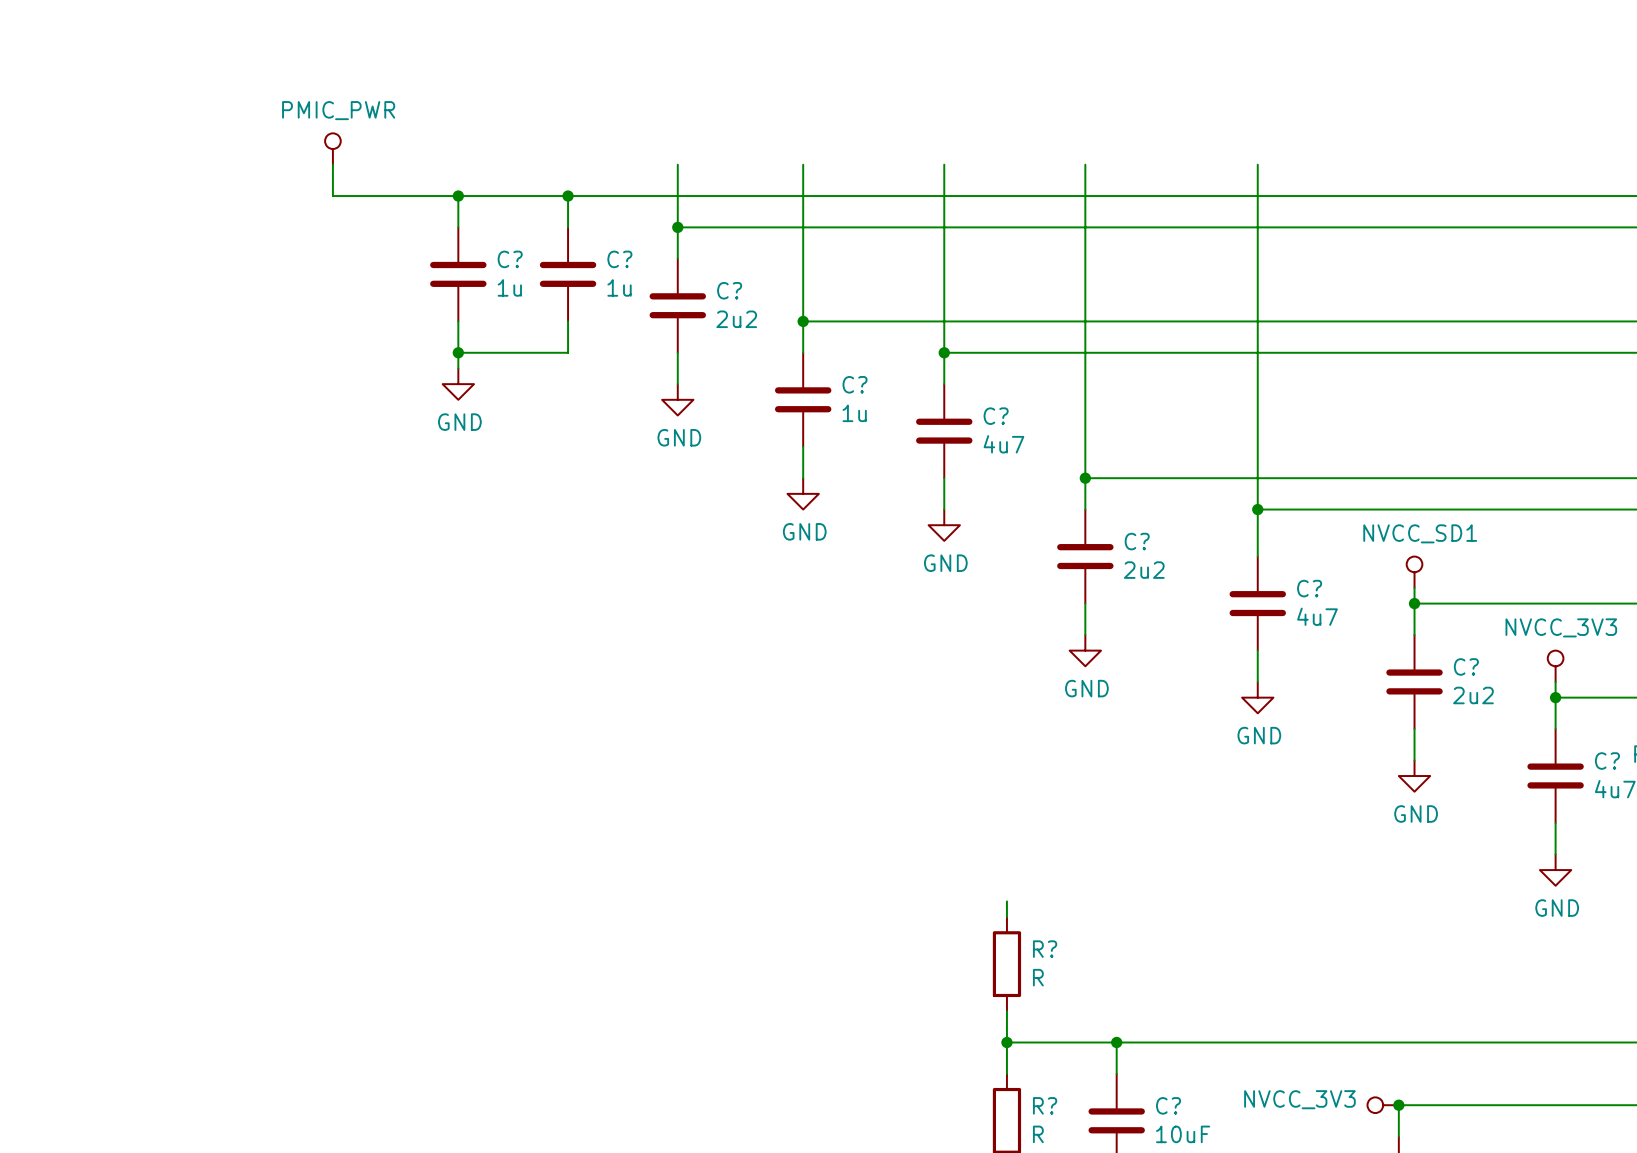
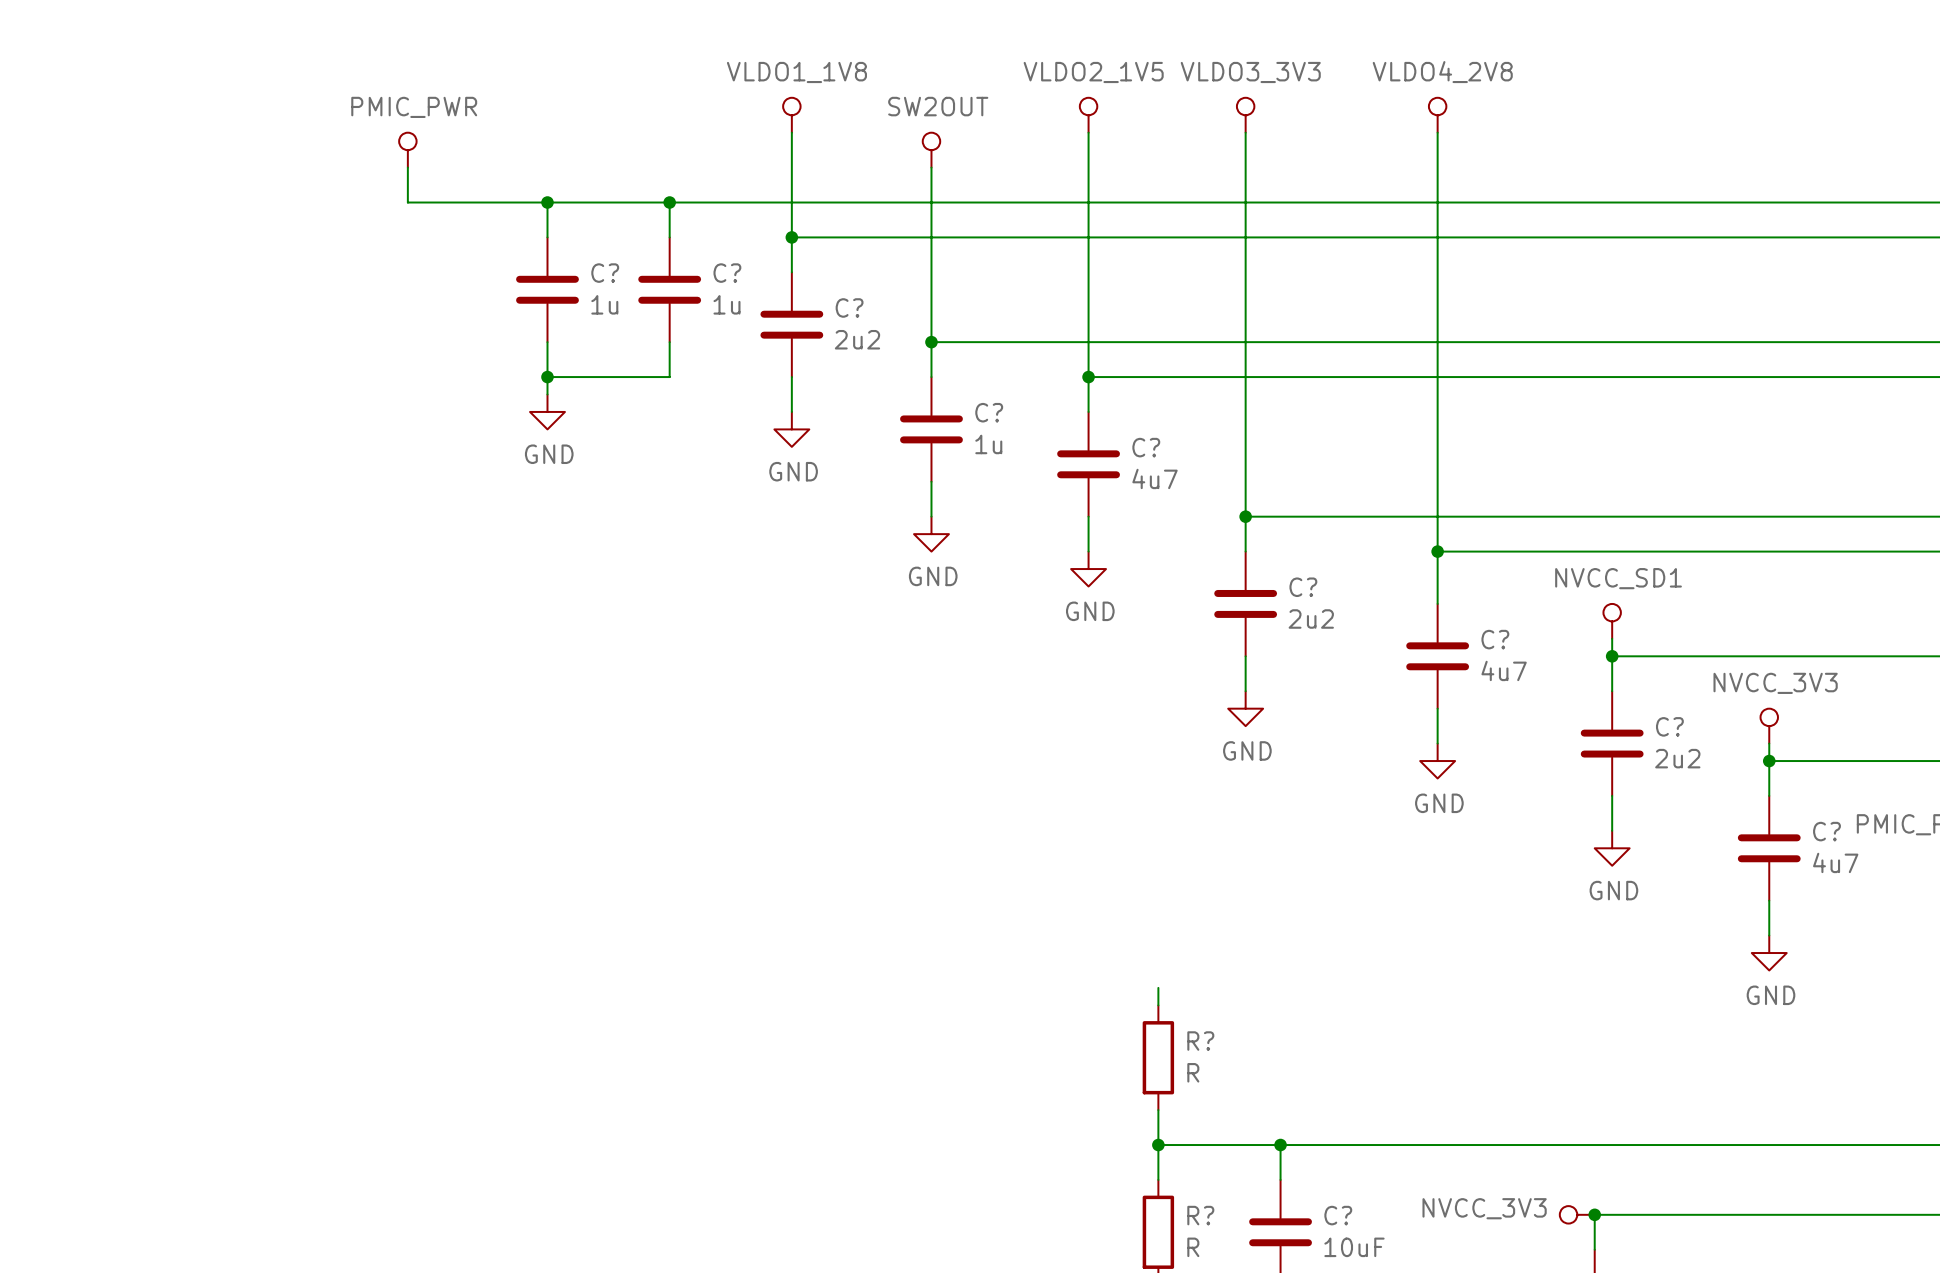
power symbol: none -> VLDO1_1V8 (791, 115)
power symbol: none -> VLDO2_1V5 (1088, 115)
power symbol: none -> VLDO3_3V3 (1245, 115)
power symbol: none -> VLDO4_2V8 (1437, 115)
wire: none -> (791, 132) (791, 167)
wire: none -> (1088, 132) (1088, 167)
wire: none -> (1245, 132) (1245, 167)
wire: none -> (1437, 132) (1437, 167)
power symbol: none -> SW2OUT (931, 150)

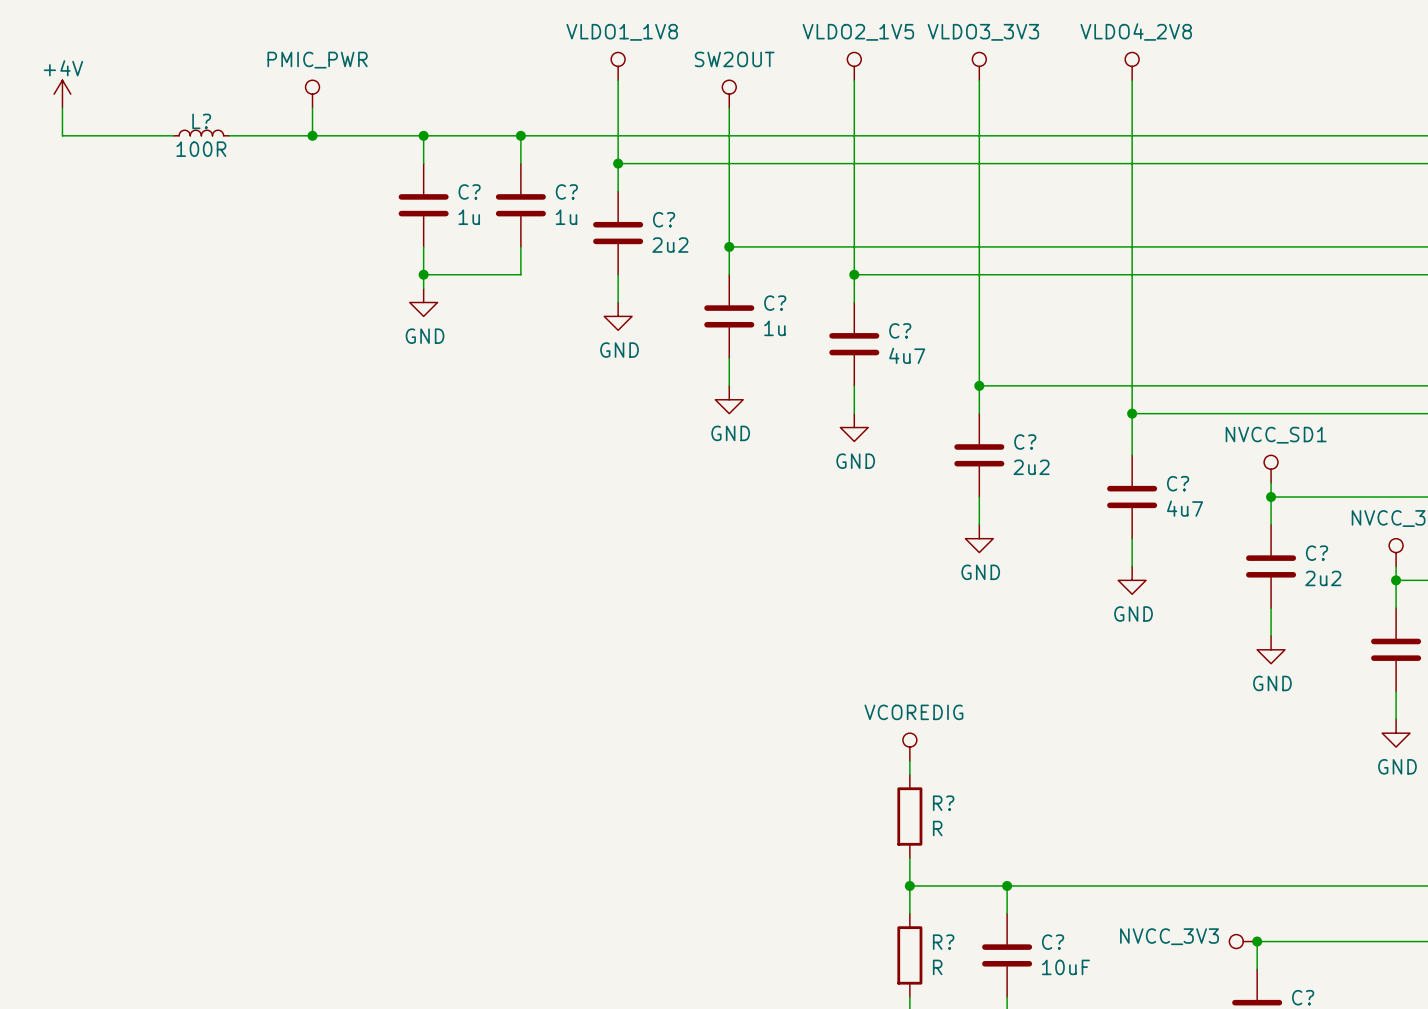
power symbol: none -> +4V (62, 94)
wire: none -> (62, 108) (62, 135) (173, 135)
L?: none -> 100R (201, 133)
wire: none -> (229, 135) (312, 135)
junction: none -> (312, 135)
power symbol: none -> VCOREDIG (909, 747)

